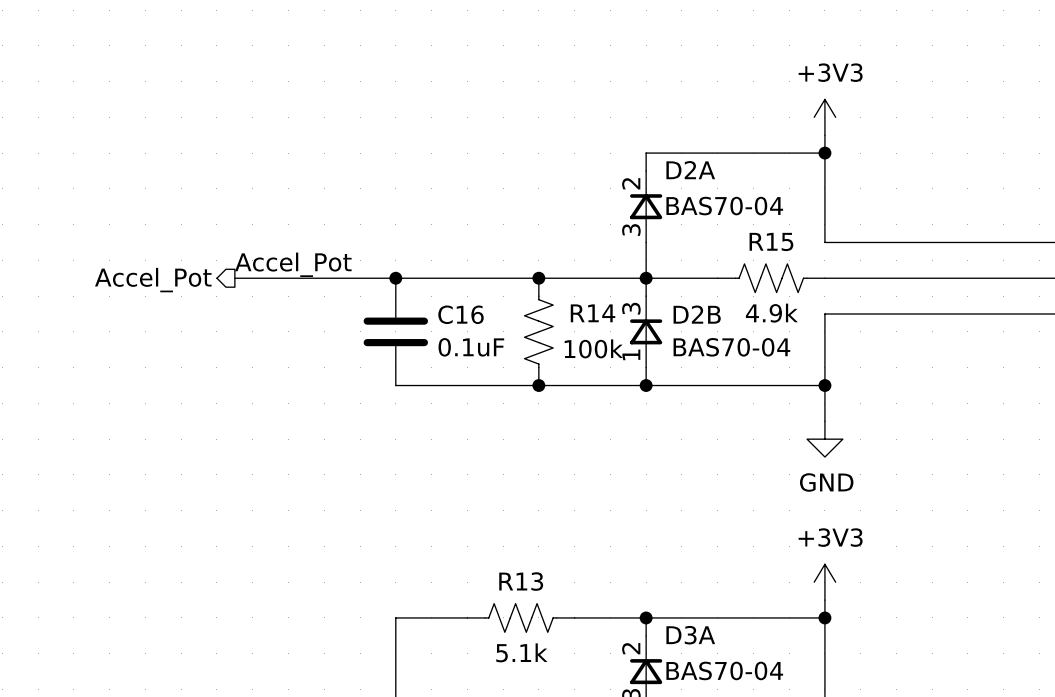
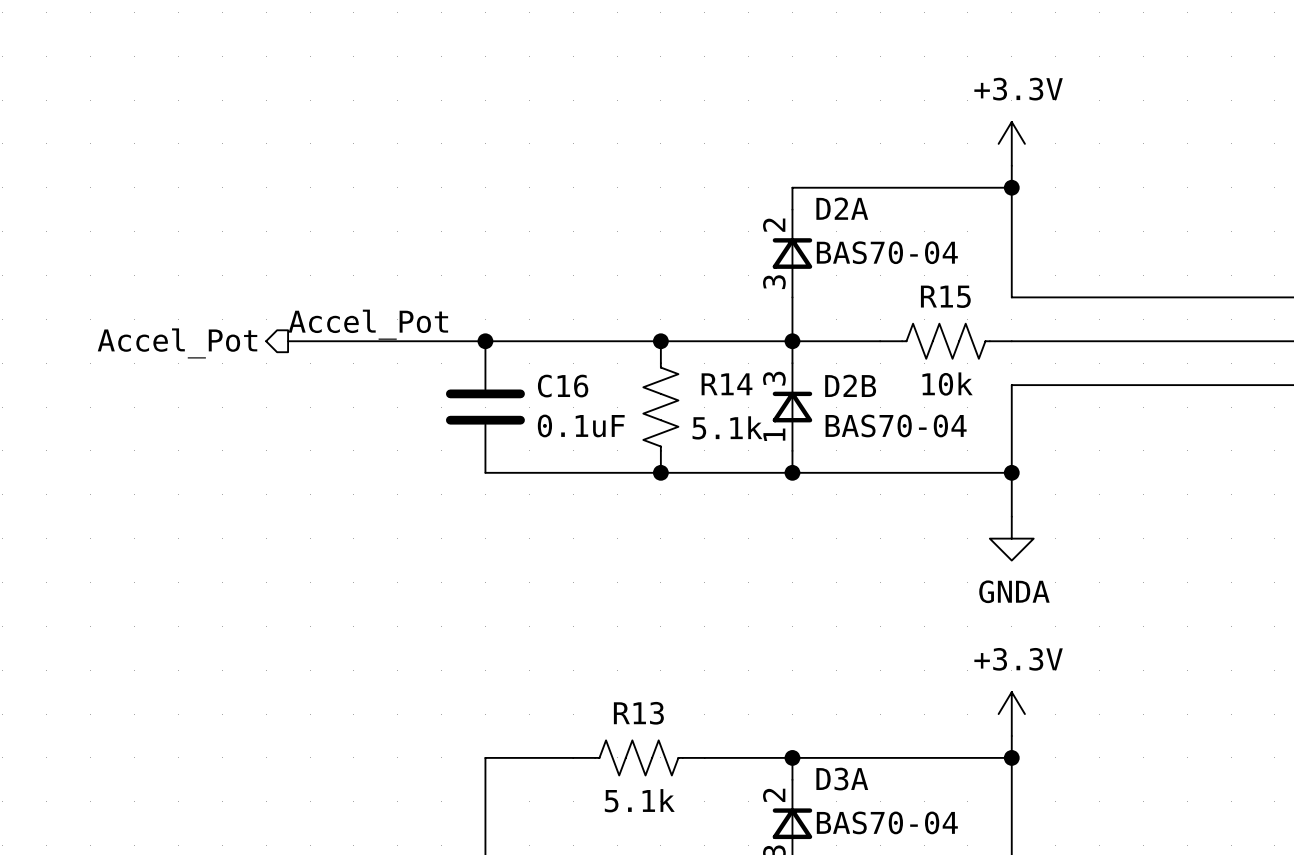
power symbol: +3V3 (824, 117) -> +3.3V (1011, 143)
R15 value: 4.9k (771, 313) -> 10k (947, 384)
R14 value: 100k (593, 348) -> 5.1k (727, 427)
power symbol: GND (824, 439) -> GNDA (1011, 538)
power symbol: +3V3 (824, 582) -> +3.3V (1011, 714)

